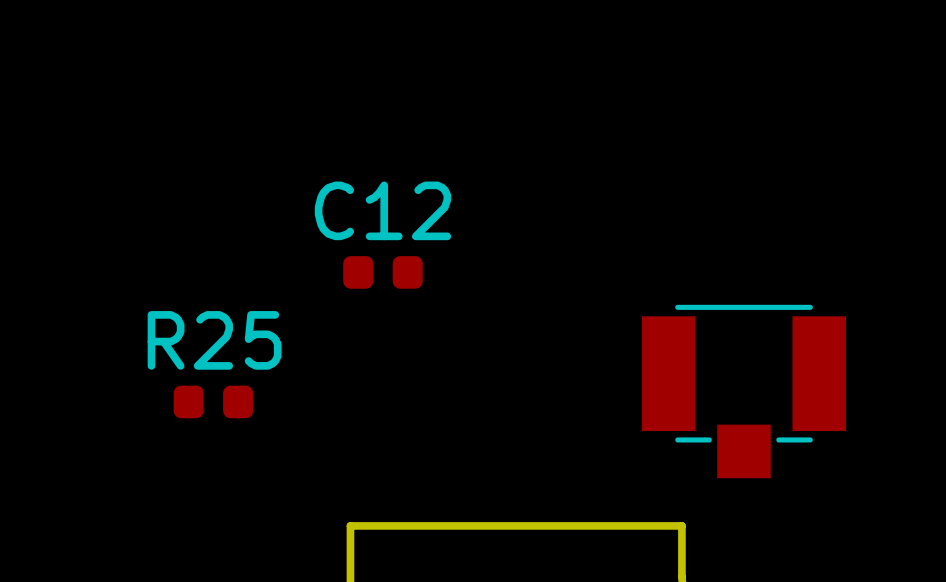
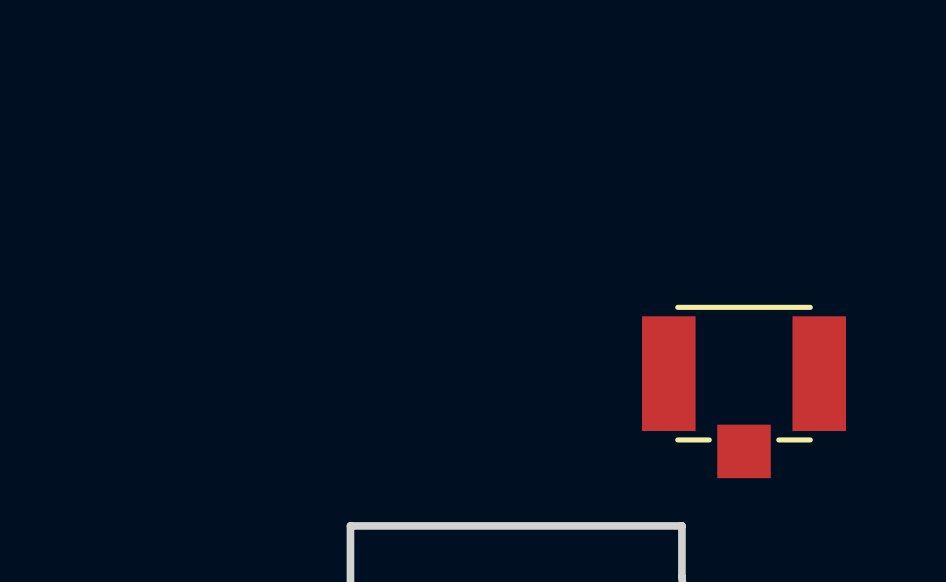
C12: (382, 272) -> none
R25: (213, 401) -> none

